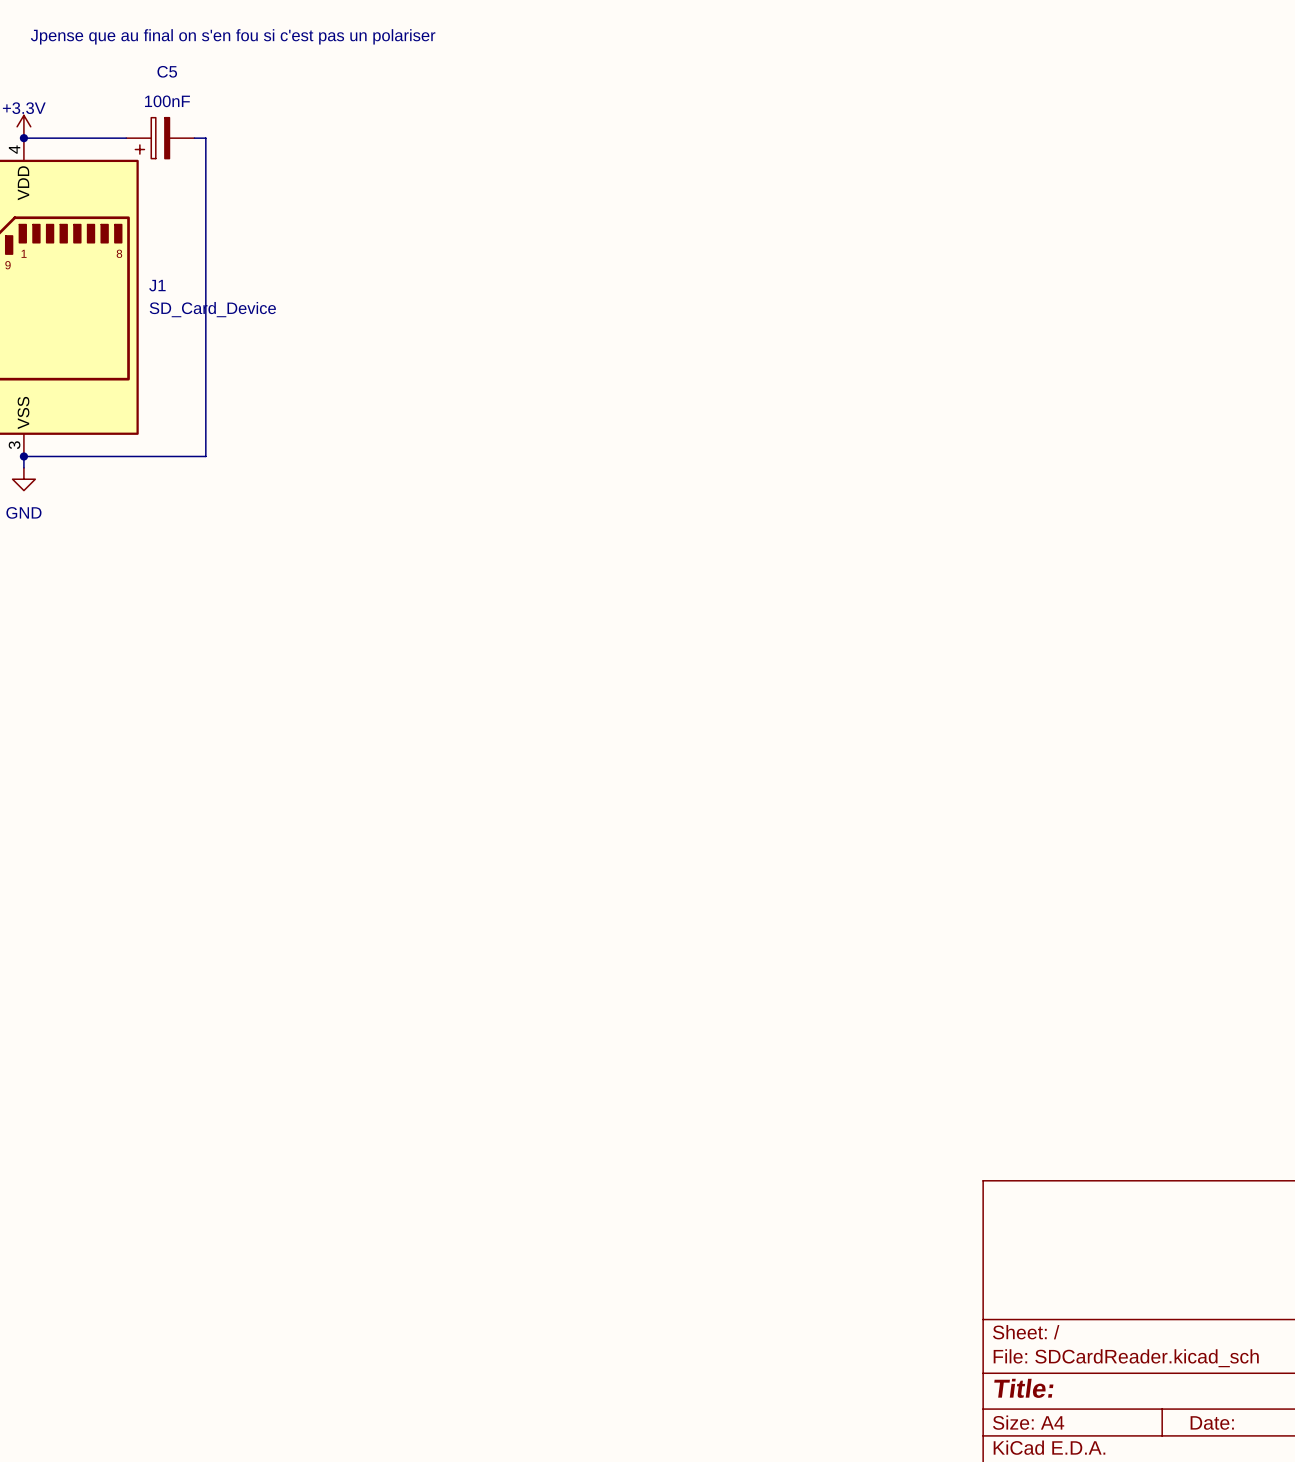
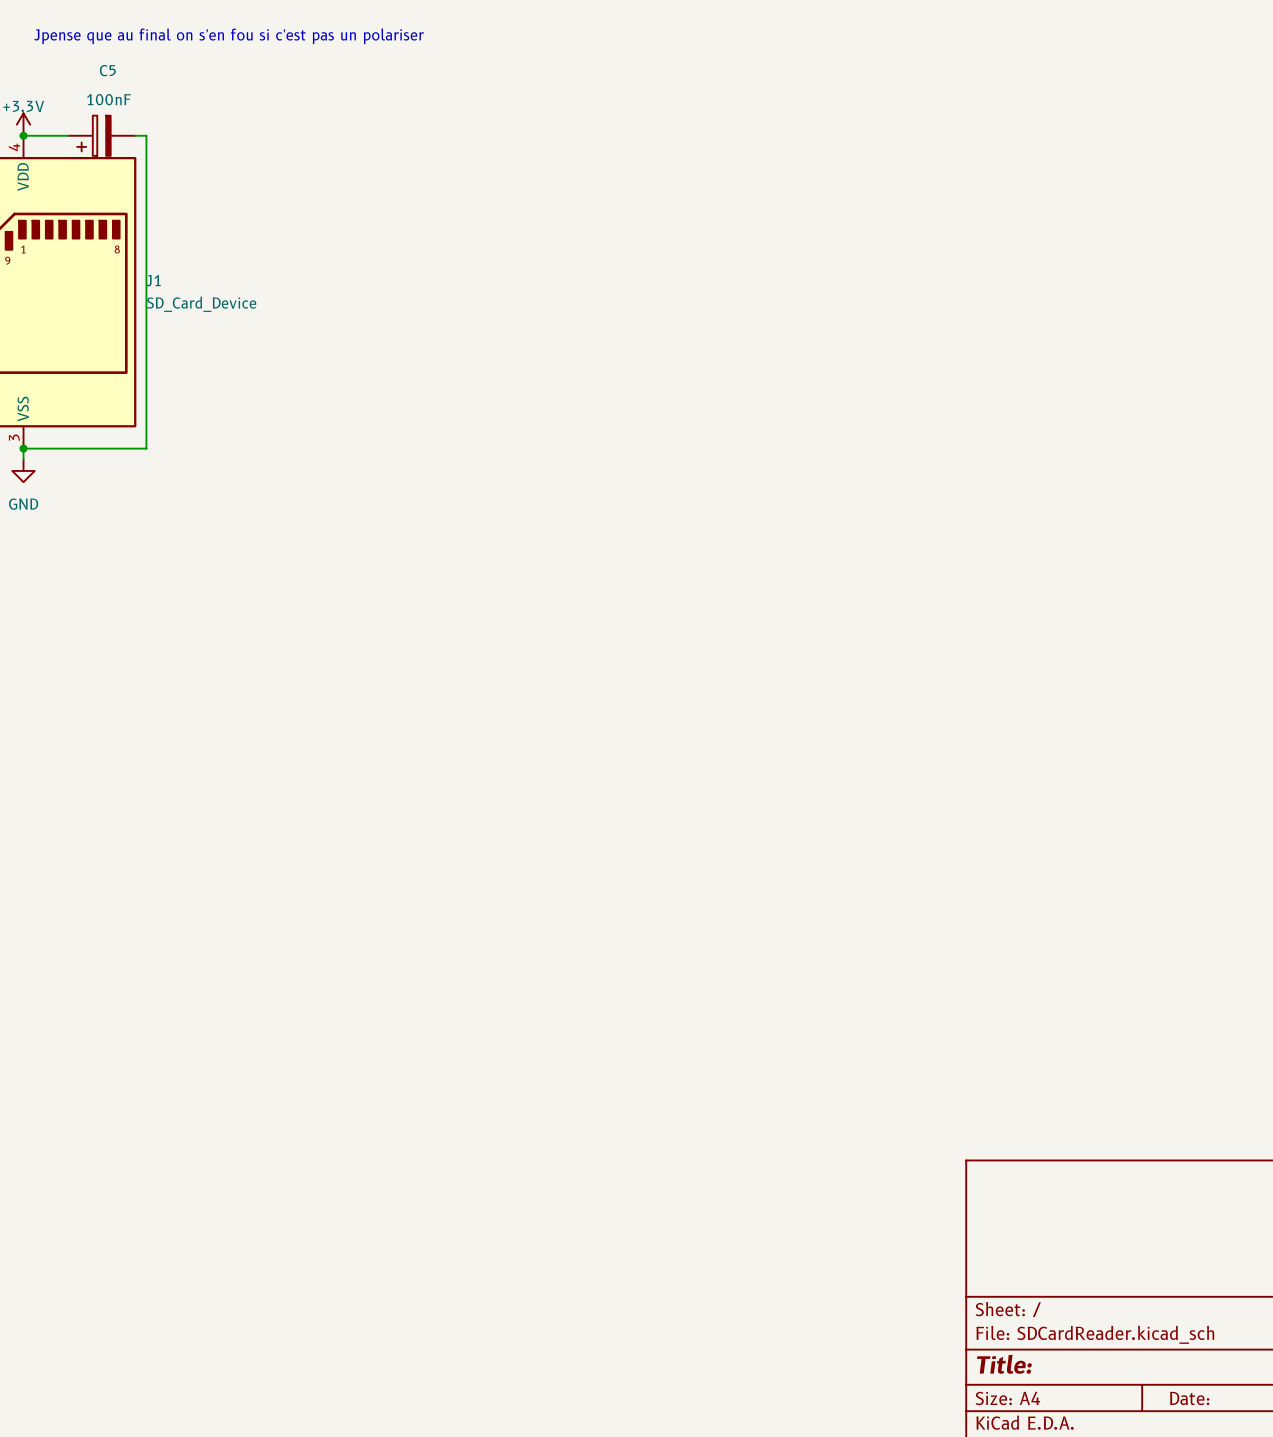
C5 position: (160, 138) -> (101, 135)
wire: (194, 138) (205, 138) (205, 456) (148, 456) -> (135, 135) (146, 135) (146, 448)

